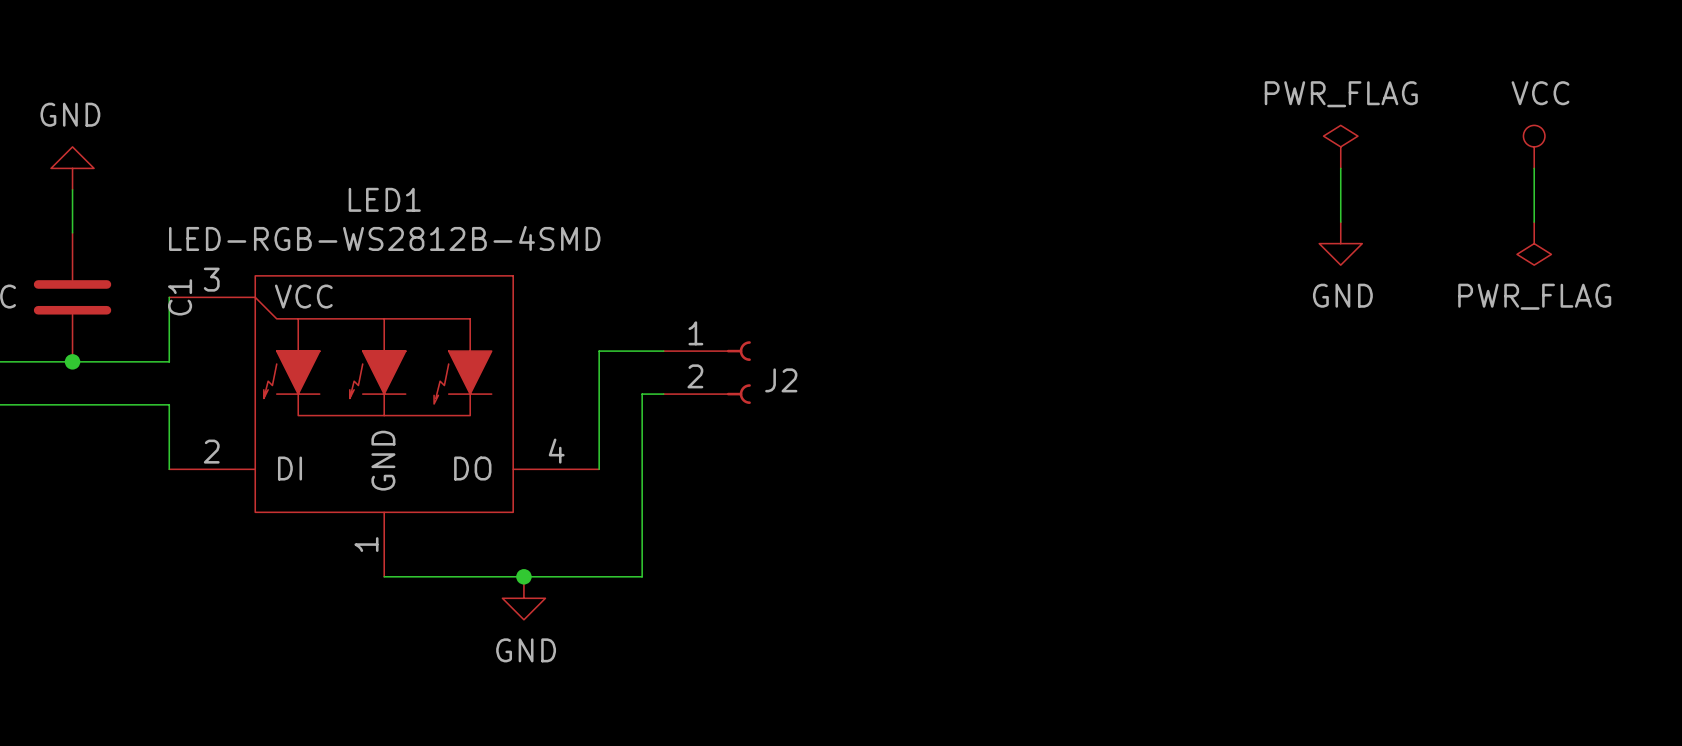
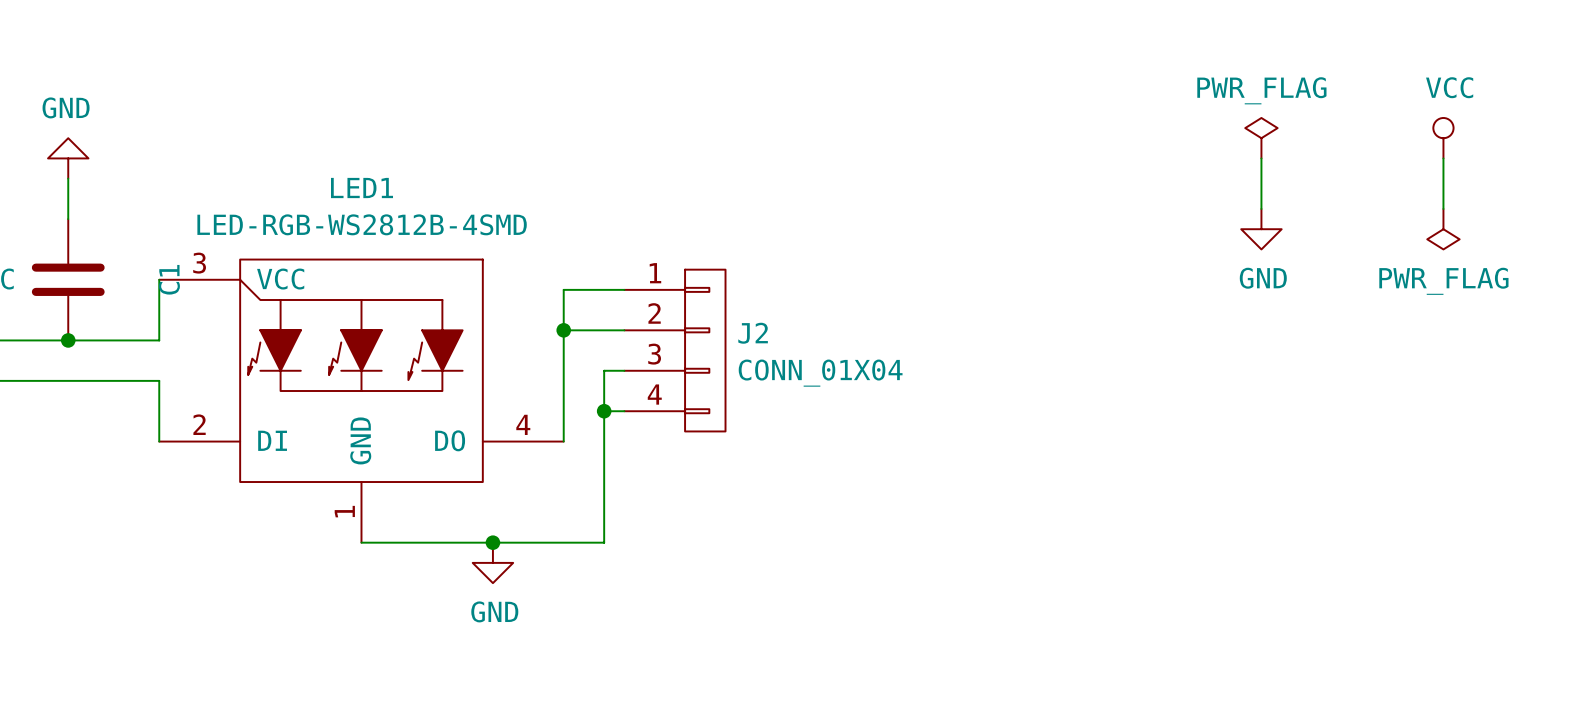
wire: none -> (624, 289) (563, 289) (563, 330)
J2 symbol: [663, 341, 751, 404] -> [624, 269, 726, 432]
junction: none -> (563, 330)
J2 value: none -> CONN_01X04 (820, 373)
wire: none -> (604, 411) (624, 411)
junction: none -> (604, 411)

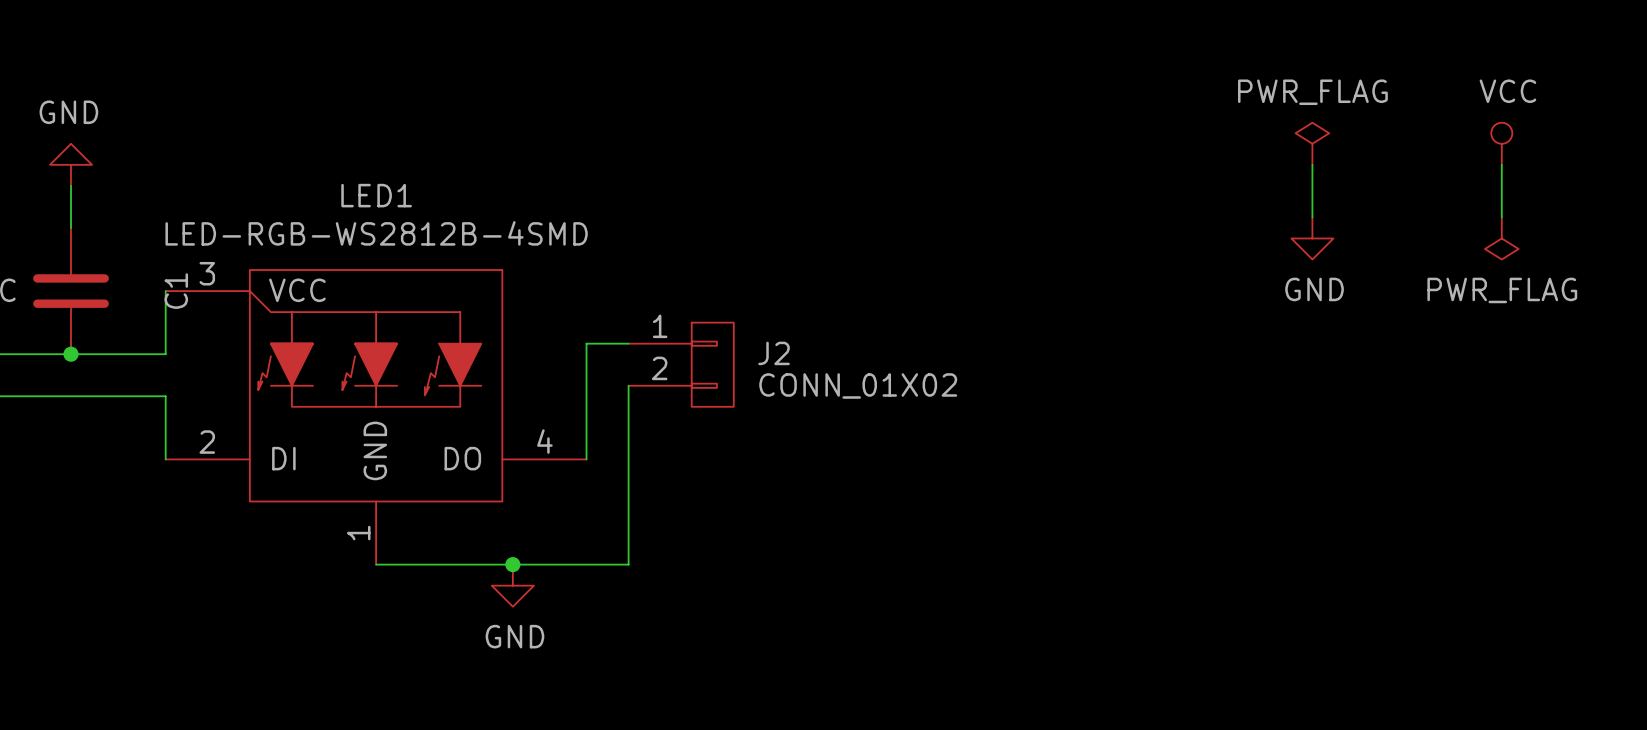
J2 symbol: [624, 269, 726, 432] -> [628, 322, 734, 407]
wire: (624, 289) (563, 289) (563, 330) -> none
junction: (563, 330) -> none
J2 value: CONN_01X04 (820, 373) -> CONN_01X02 (858, 385)
wire: (604, 411) (624, 411) -> none
junction: (604, 411) -> none

